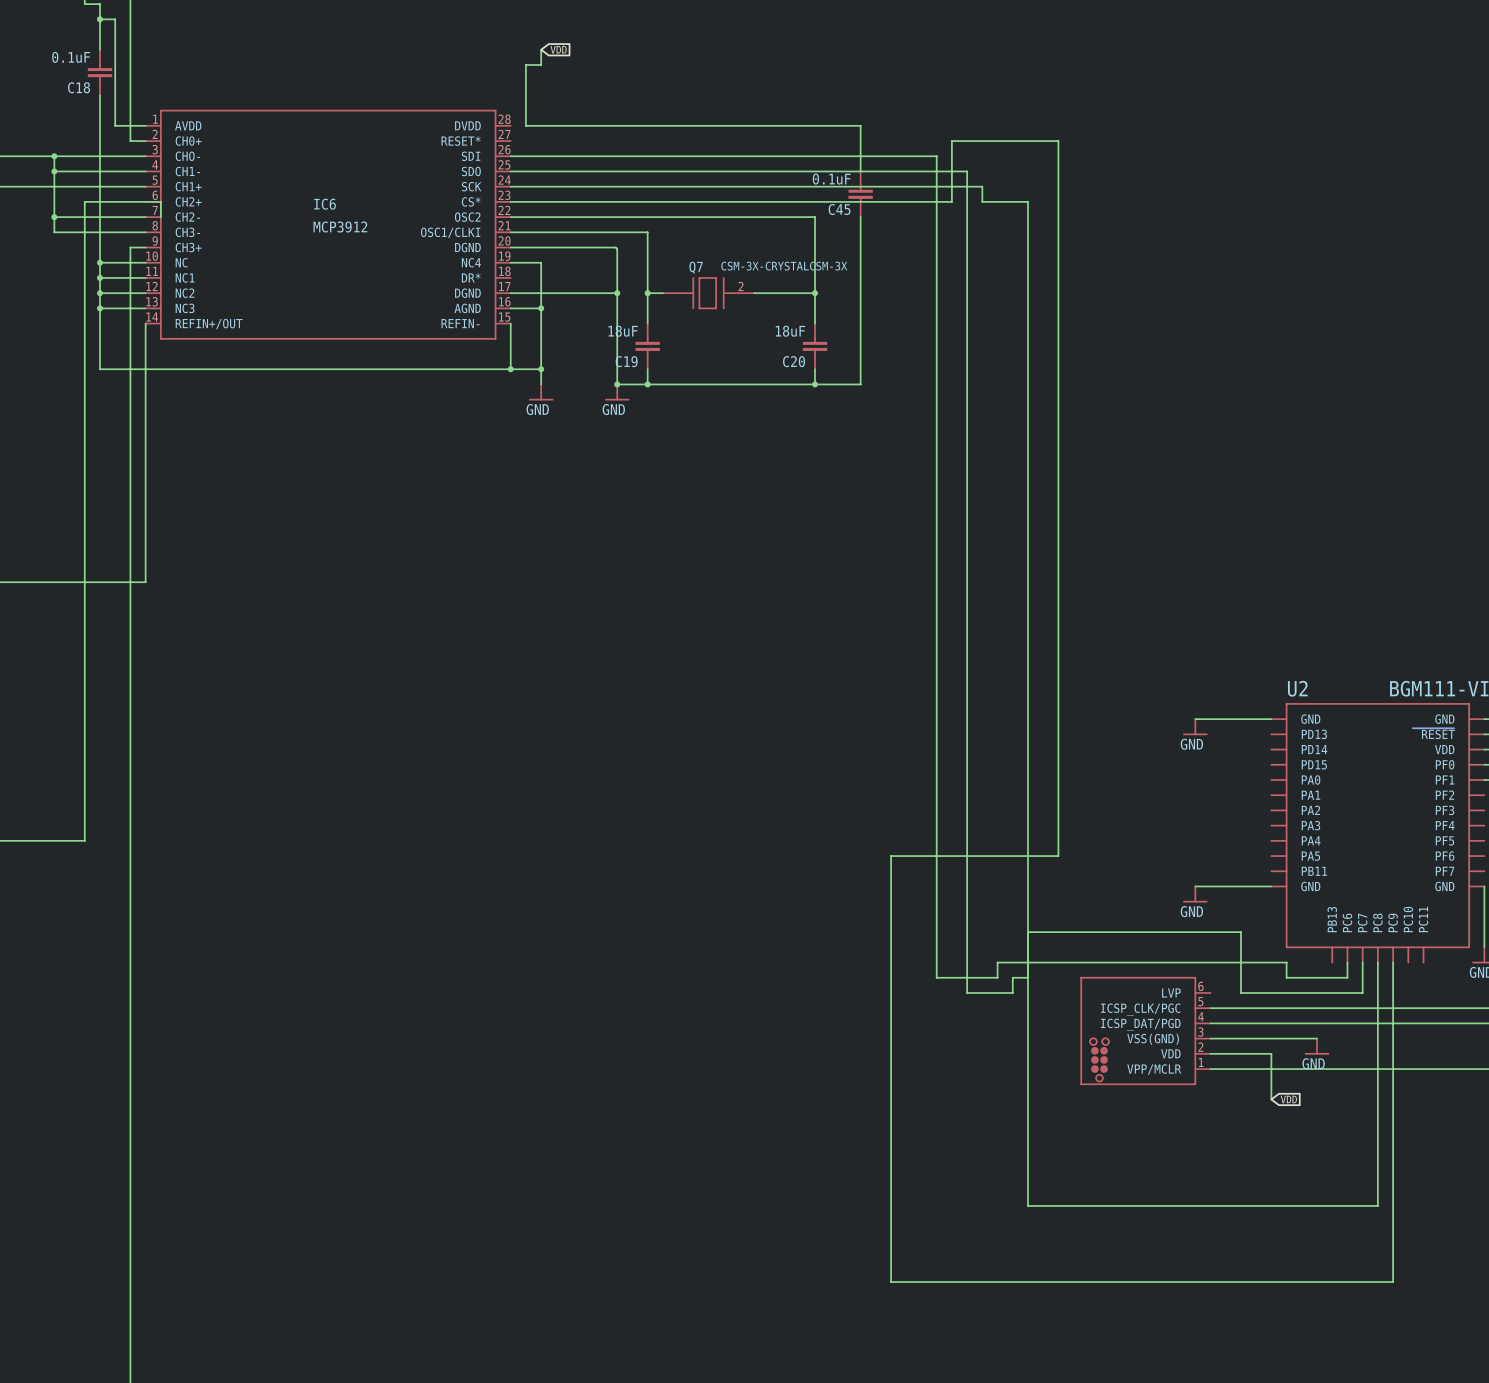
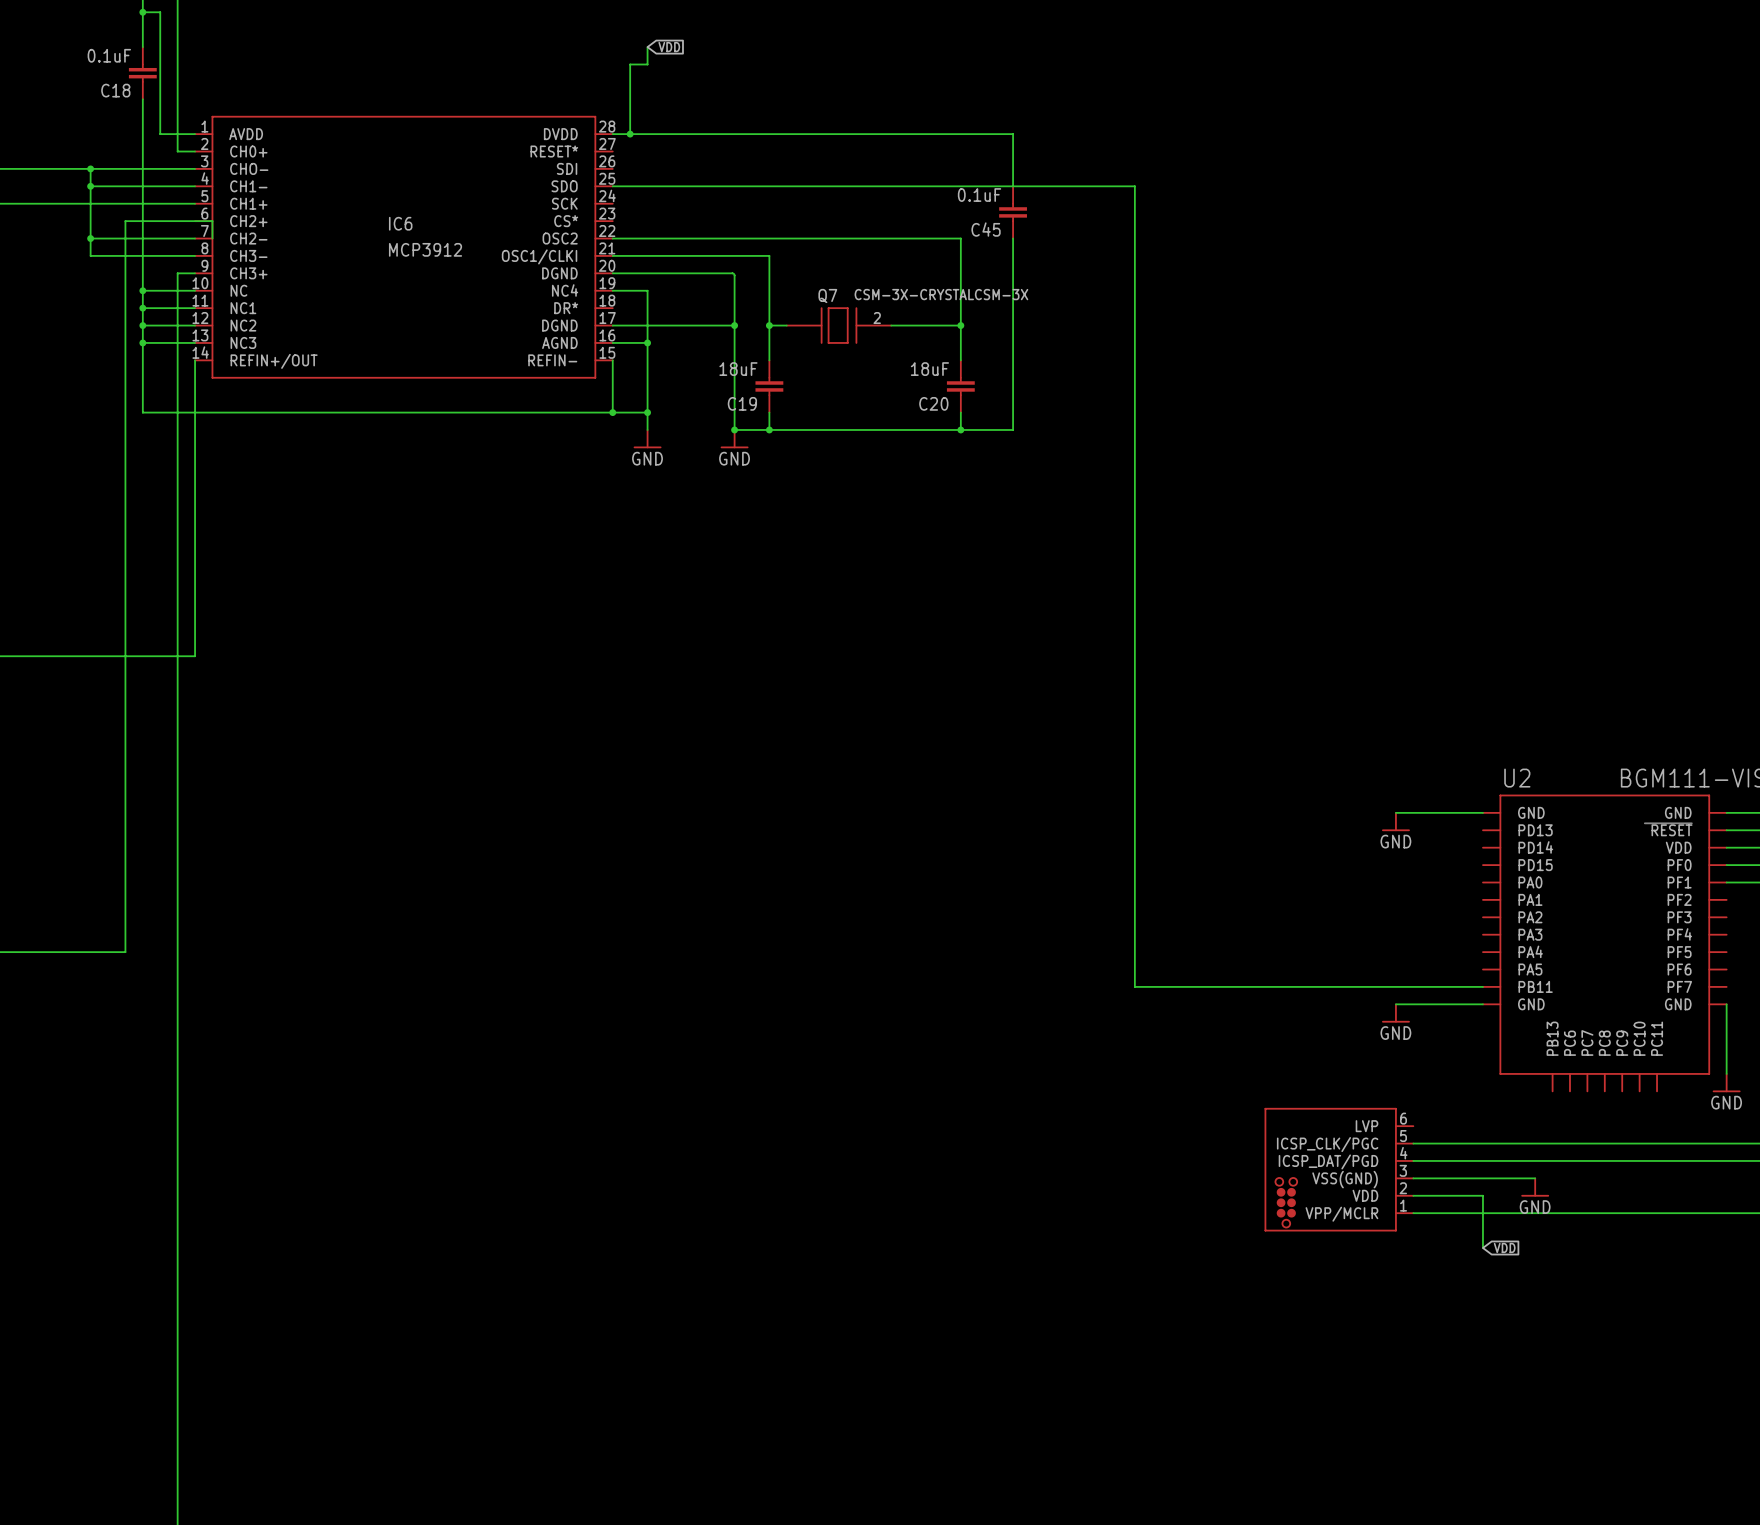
wire: none -> (612, 134) (630, 134)
junction: none -> (630, 134)
wire: (510, 156) (936, 156) (936, 977) (997, 977) (997, 962) (1286, 962) (1286, 977) (1347, 977) (1347, 962) -> none
wire: (510, 186) (982, 186) (982, 201) (1027, 201) (1027, 1205) (1377, 1205) (1377, 962) -> none
wire: (510, 201) (951, 201) (951, 141) (1058, 141) (1058, 856) (891, 856) (891, 1282) (1393, 1282) (1393, 962) -> none
wire: (967, 871) (967, 992) (1012, 992) (1012, 977) (1027, 977) -> (1134, 986) (1482, 986)
wire: (1027, 932) (1240, 932) (1240, 992) (1362, 992) (1362, 962) -> none

